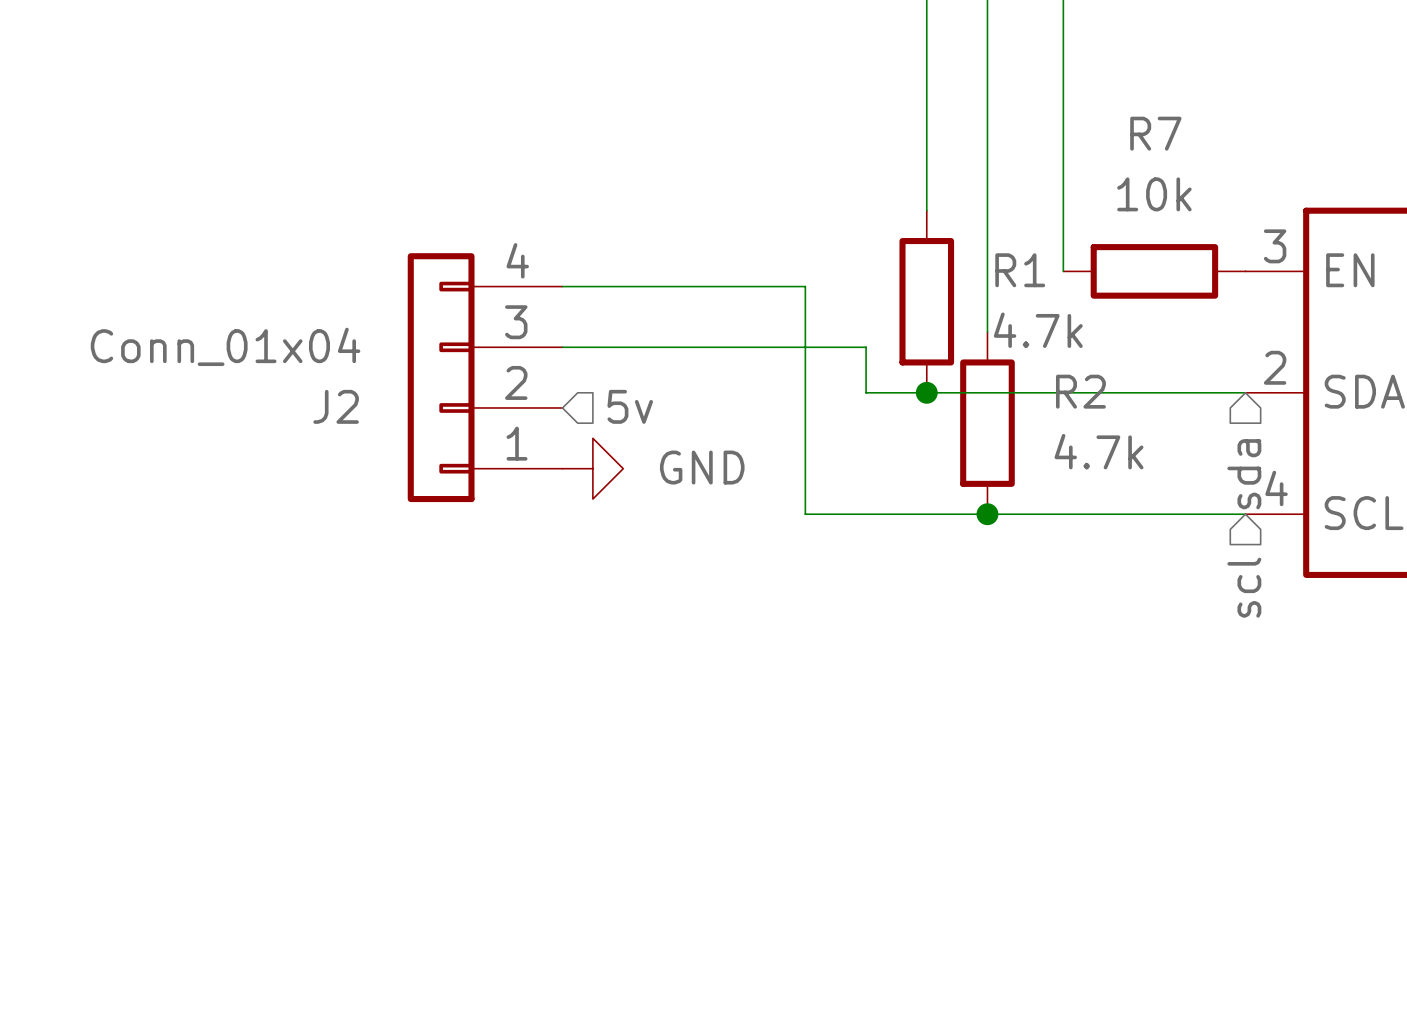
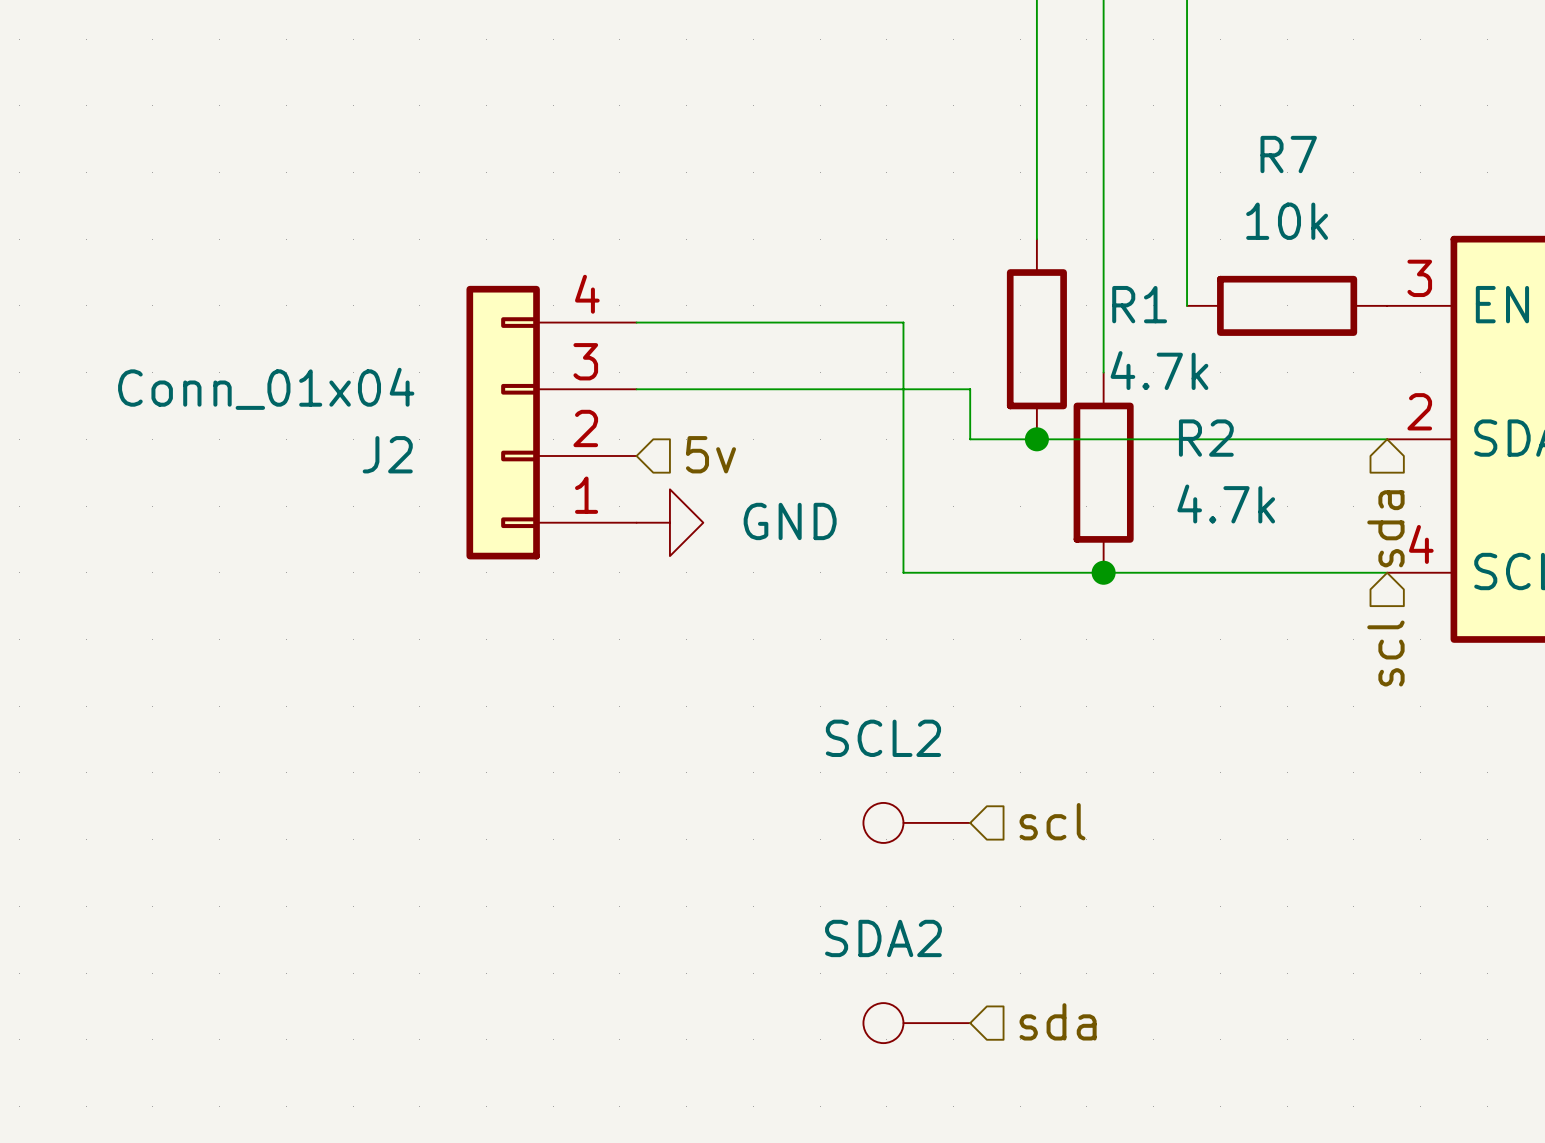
hierarchical label: none -> scl (1052, 821)
SCL2: none -> (916, 822)
hierarchical label: none -> sda (1058, 1021)
SDA2: none -> (916, 1023)

